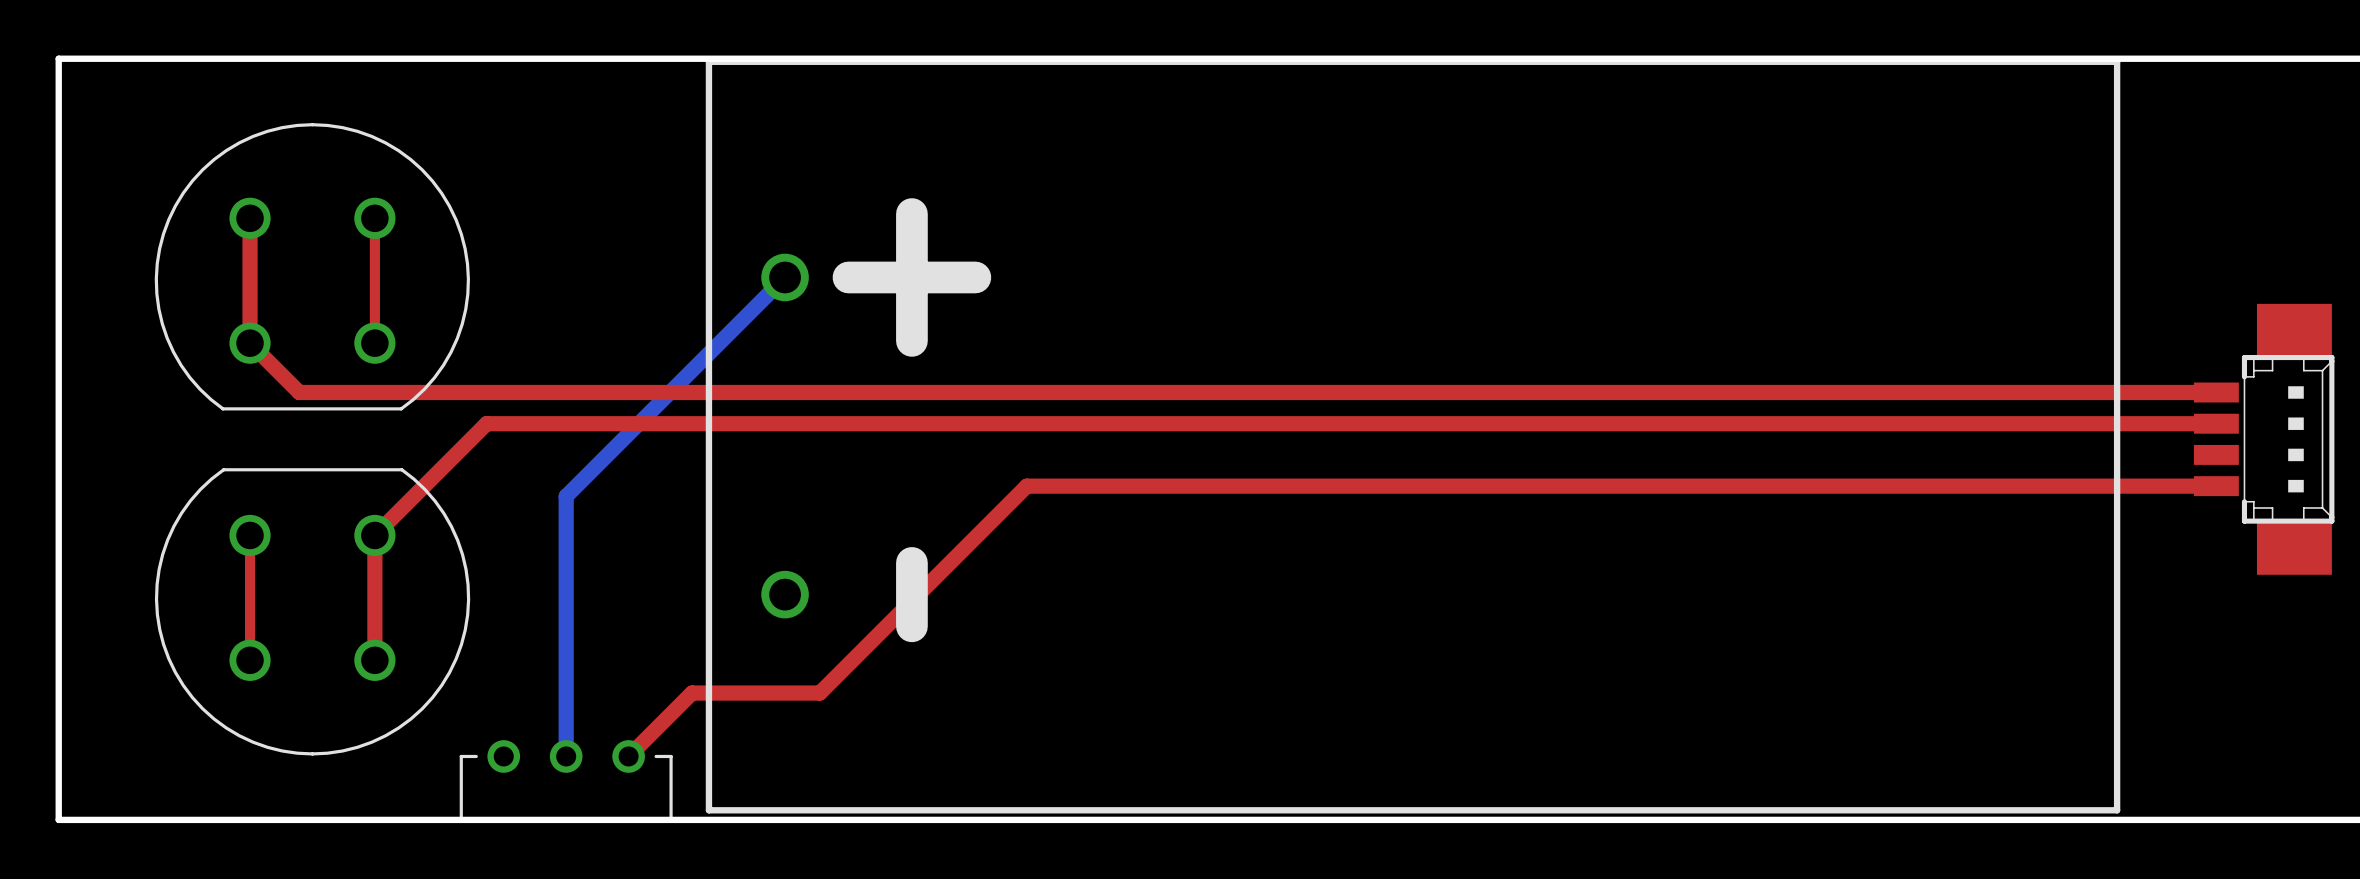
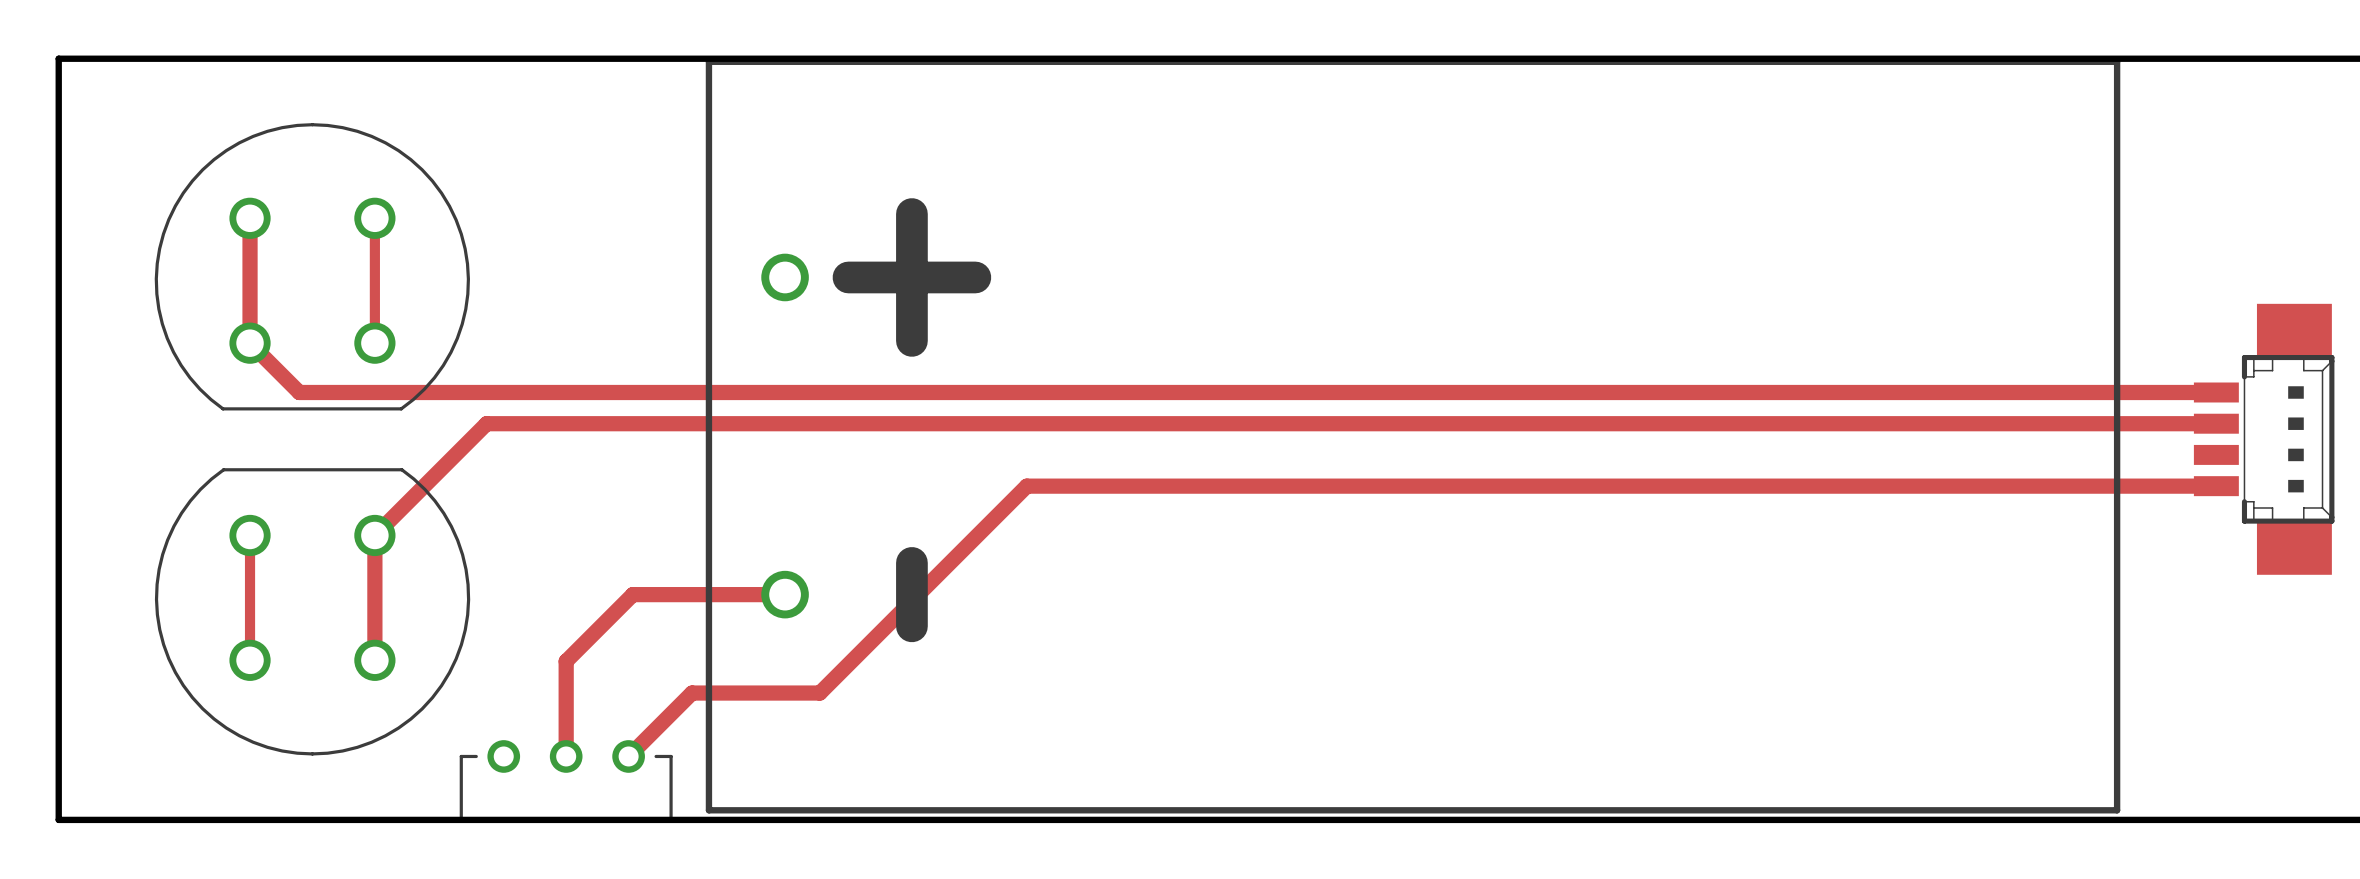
bottom track: (785, 277) (566, 496) (566, 756) -> none
top track: none -> (785, 594) (632, 594) (566, 661) (566, 756)

